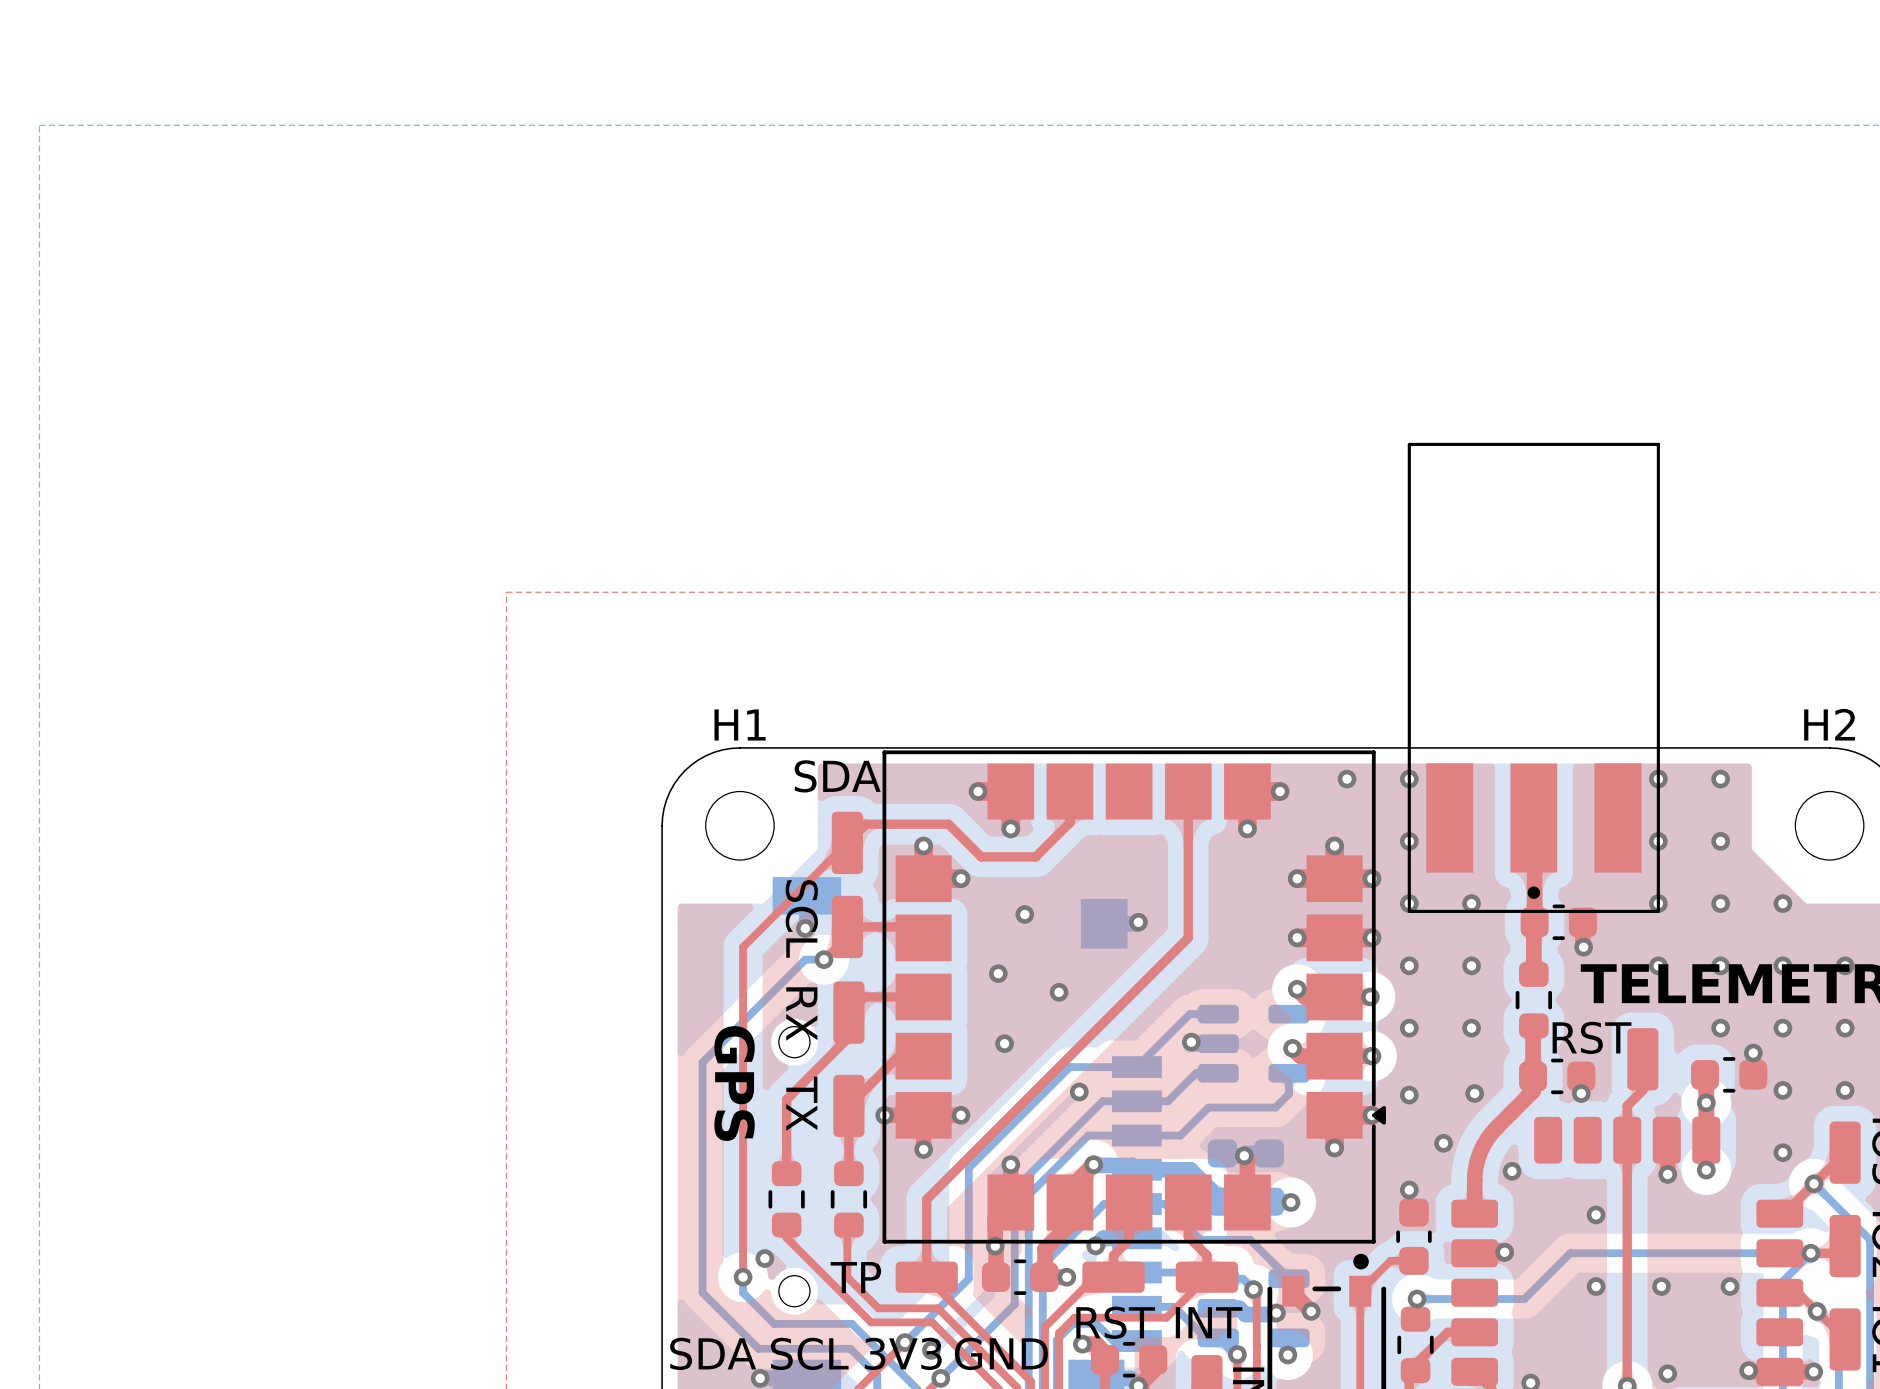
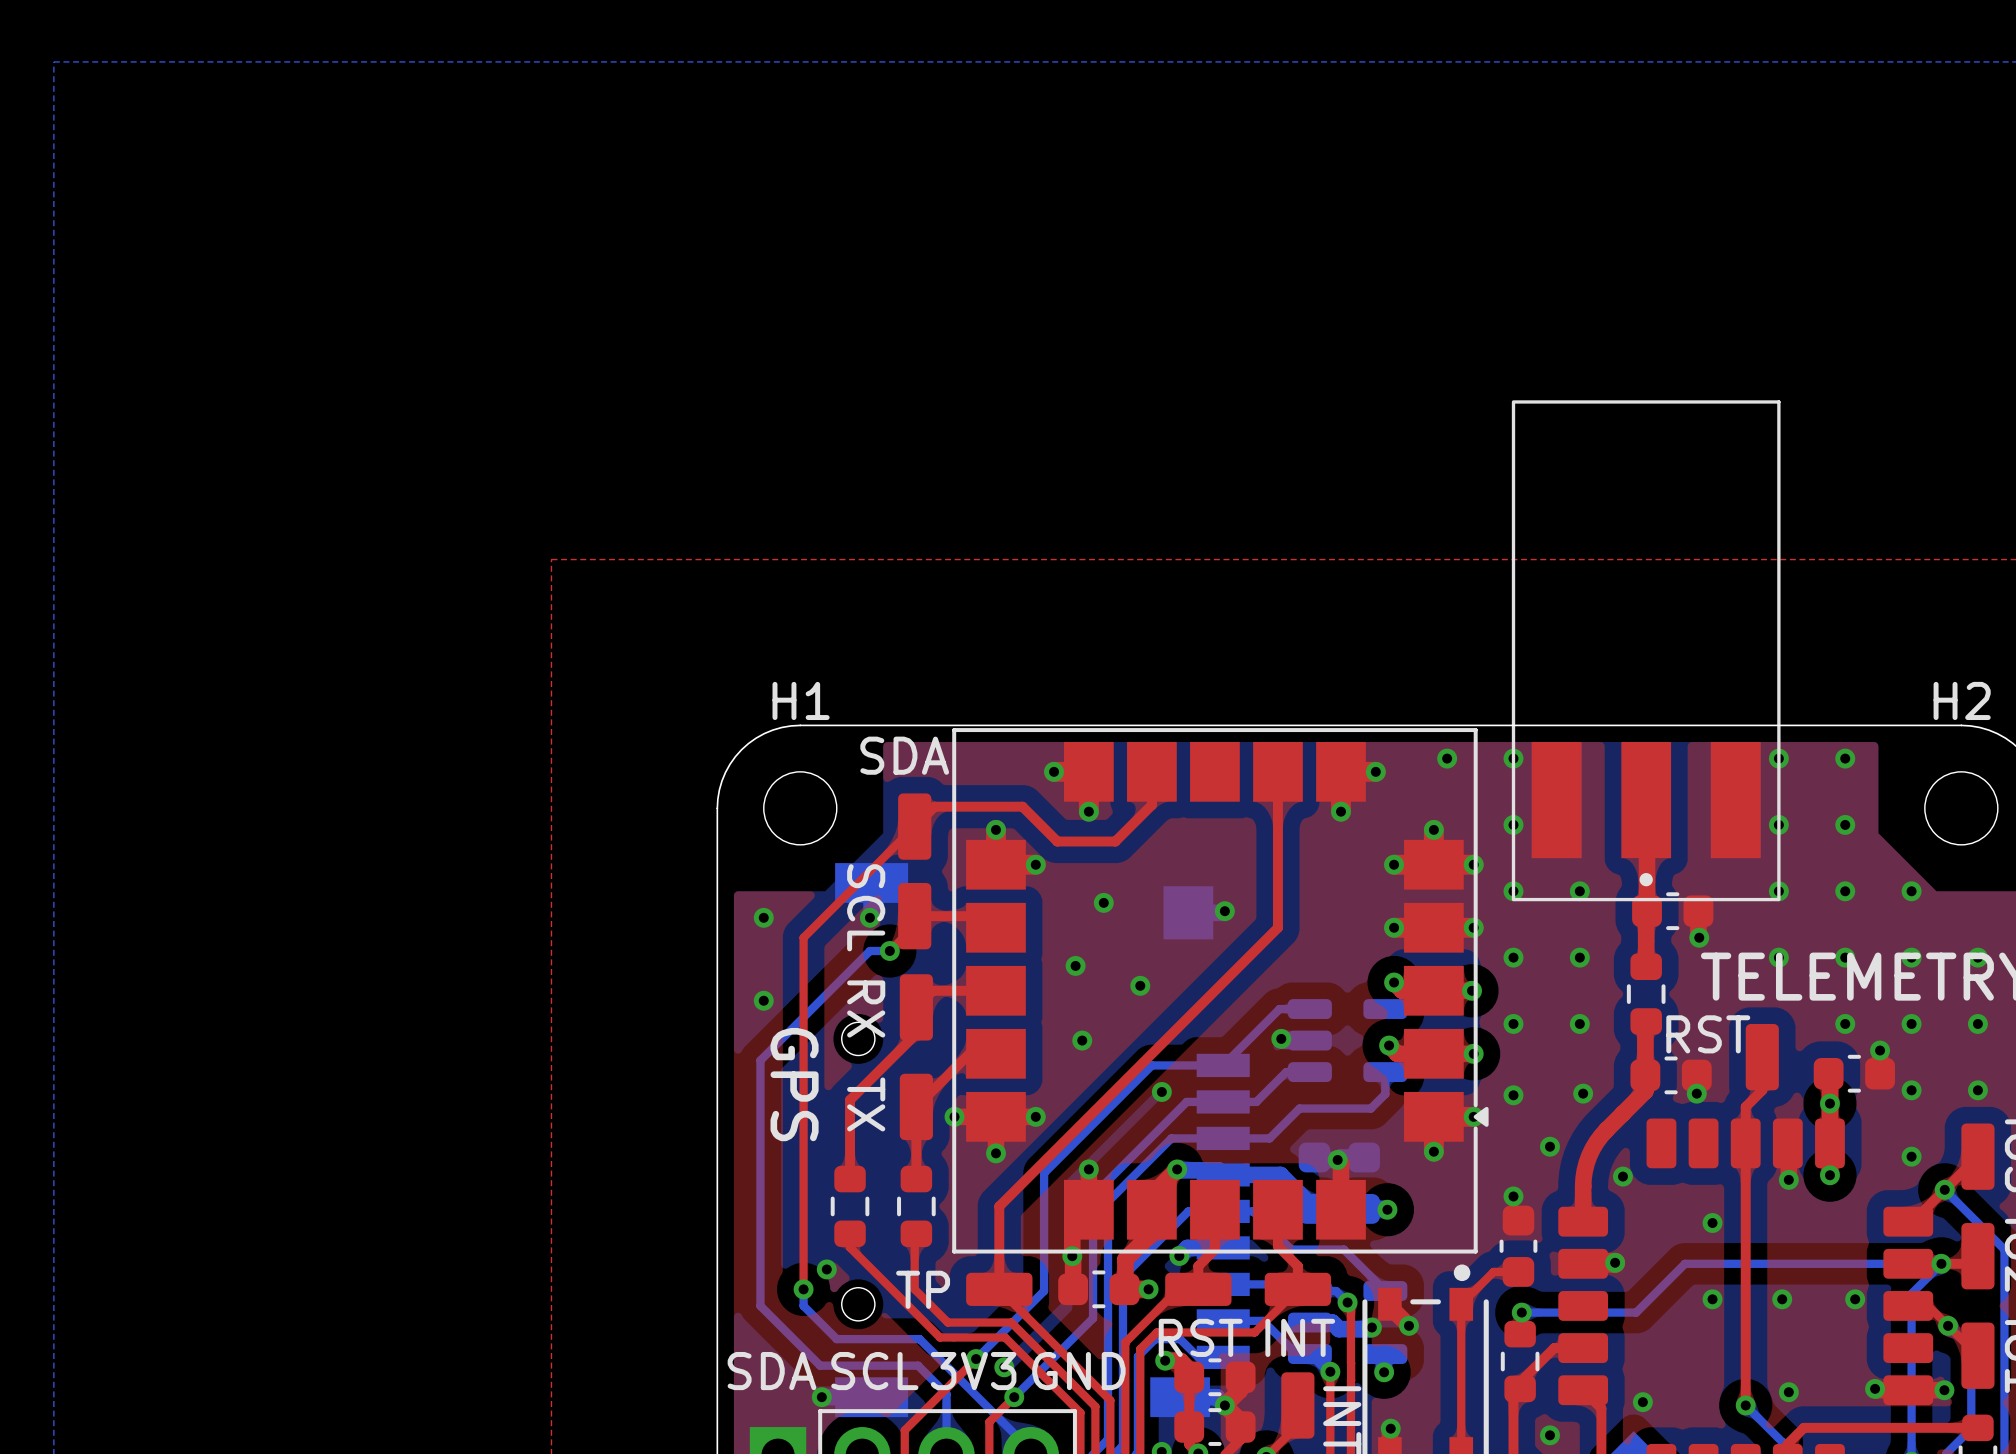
via: none -> (763, 917)
via: none -> (763, 1000)

